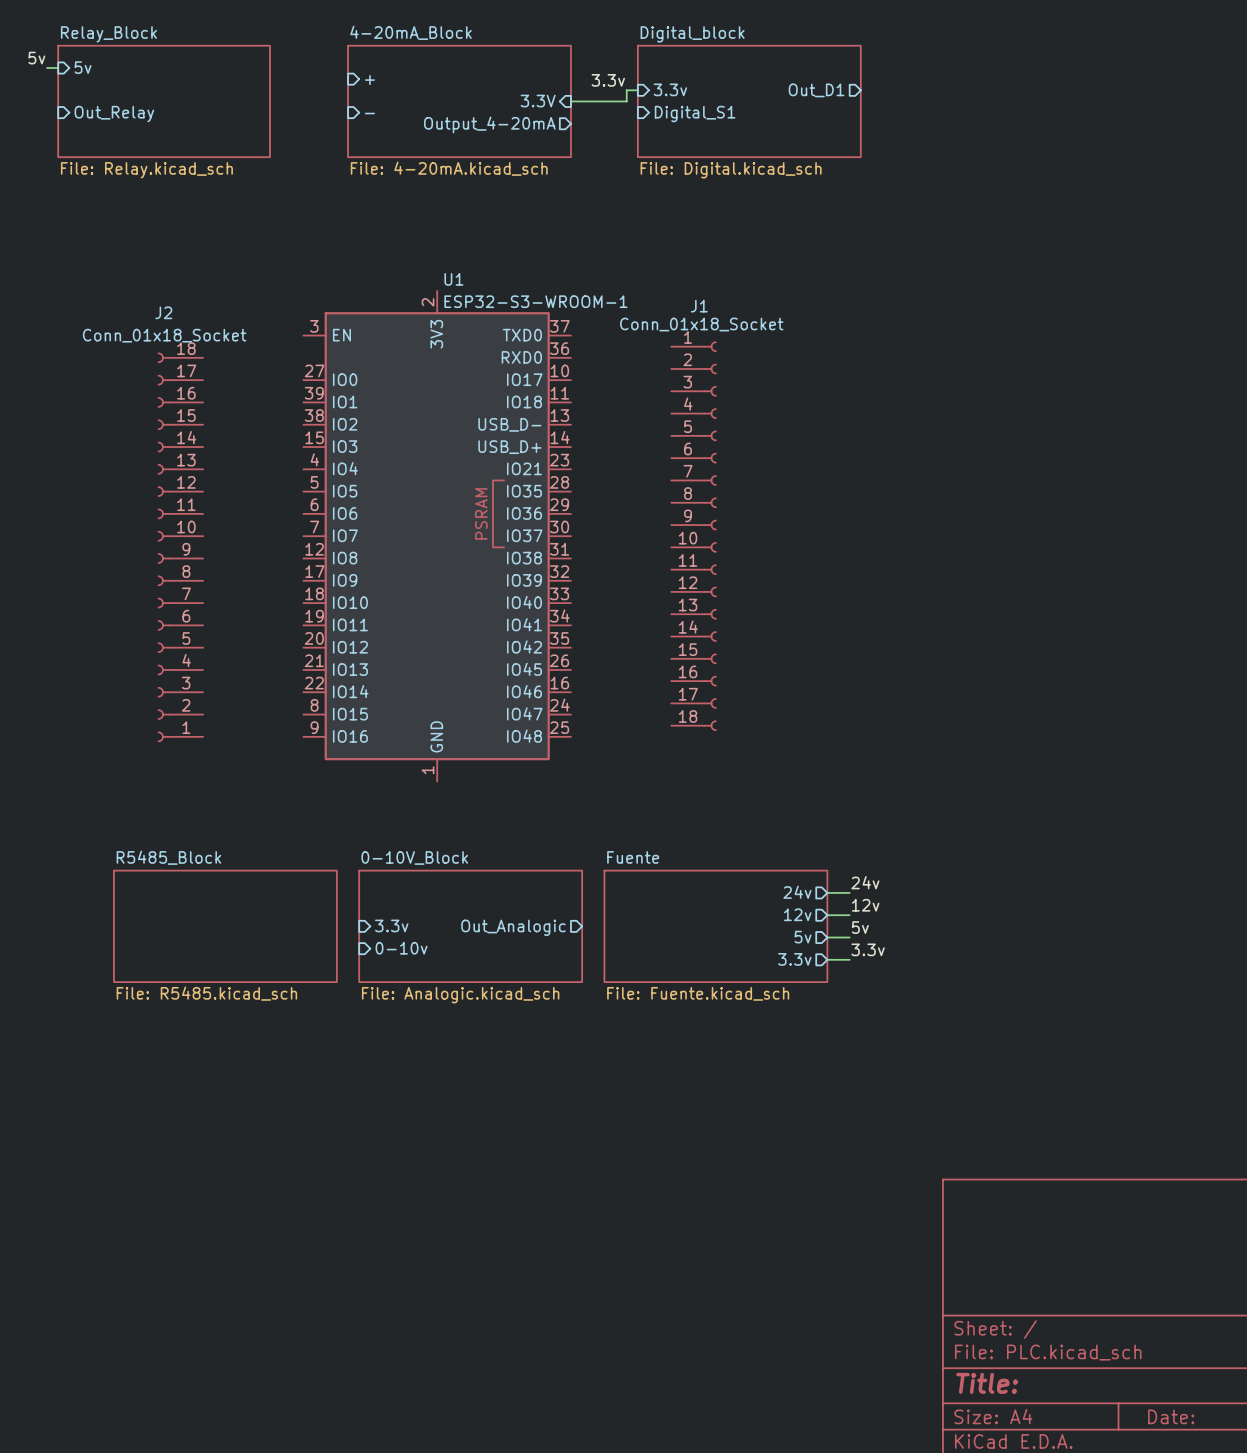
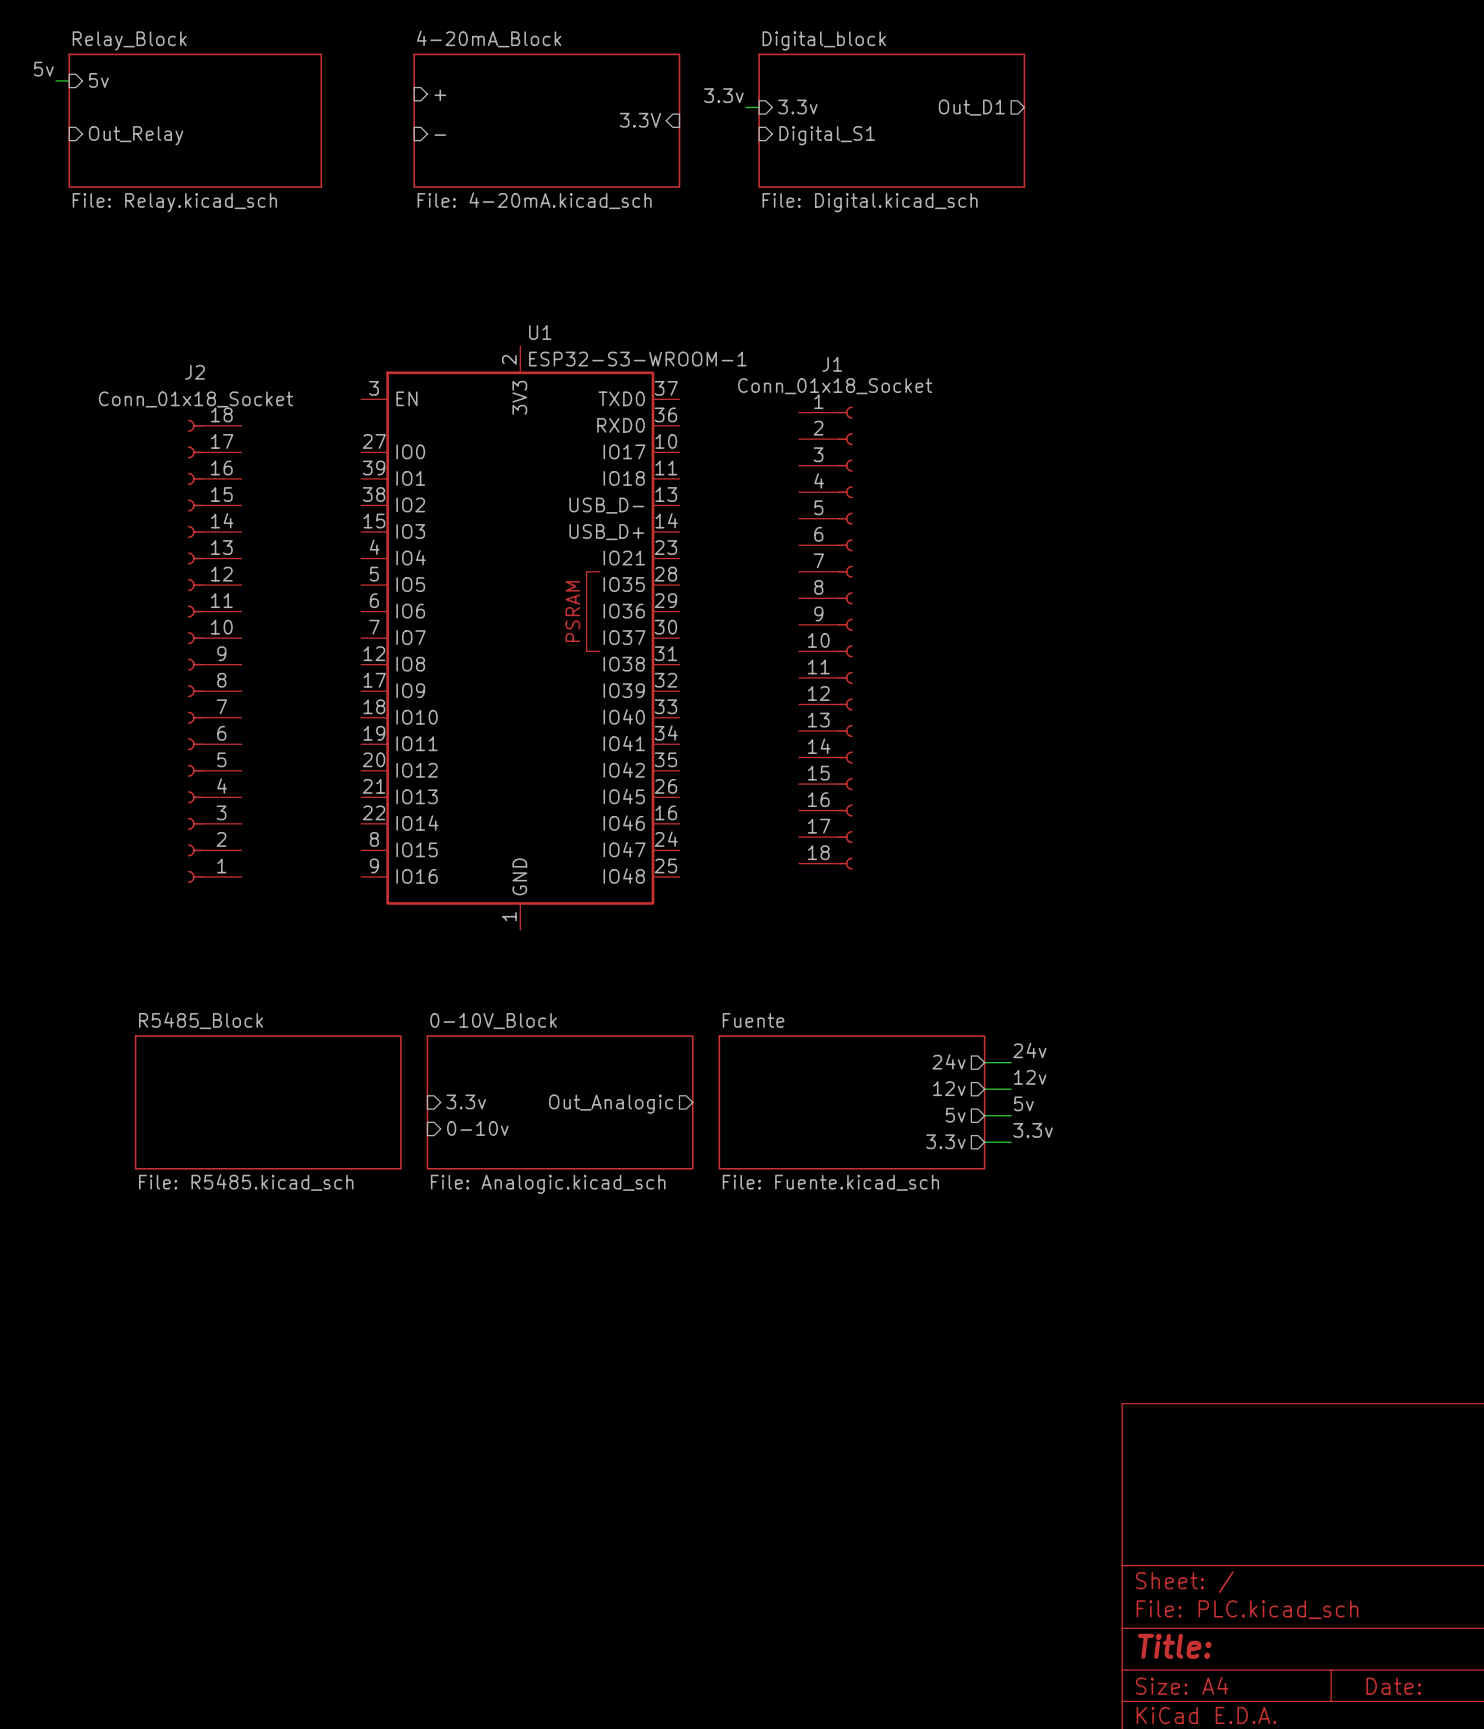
wire: (626, 90) (626, 101) (570, 101) -> none
sheet pin: Output_4-20mA (489, 124) -> none

